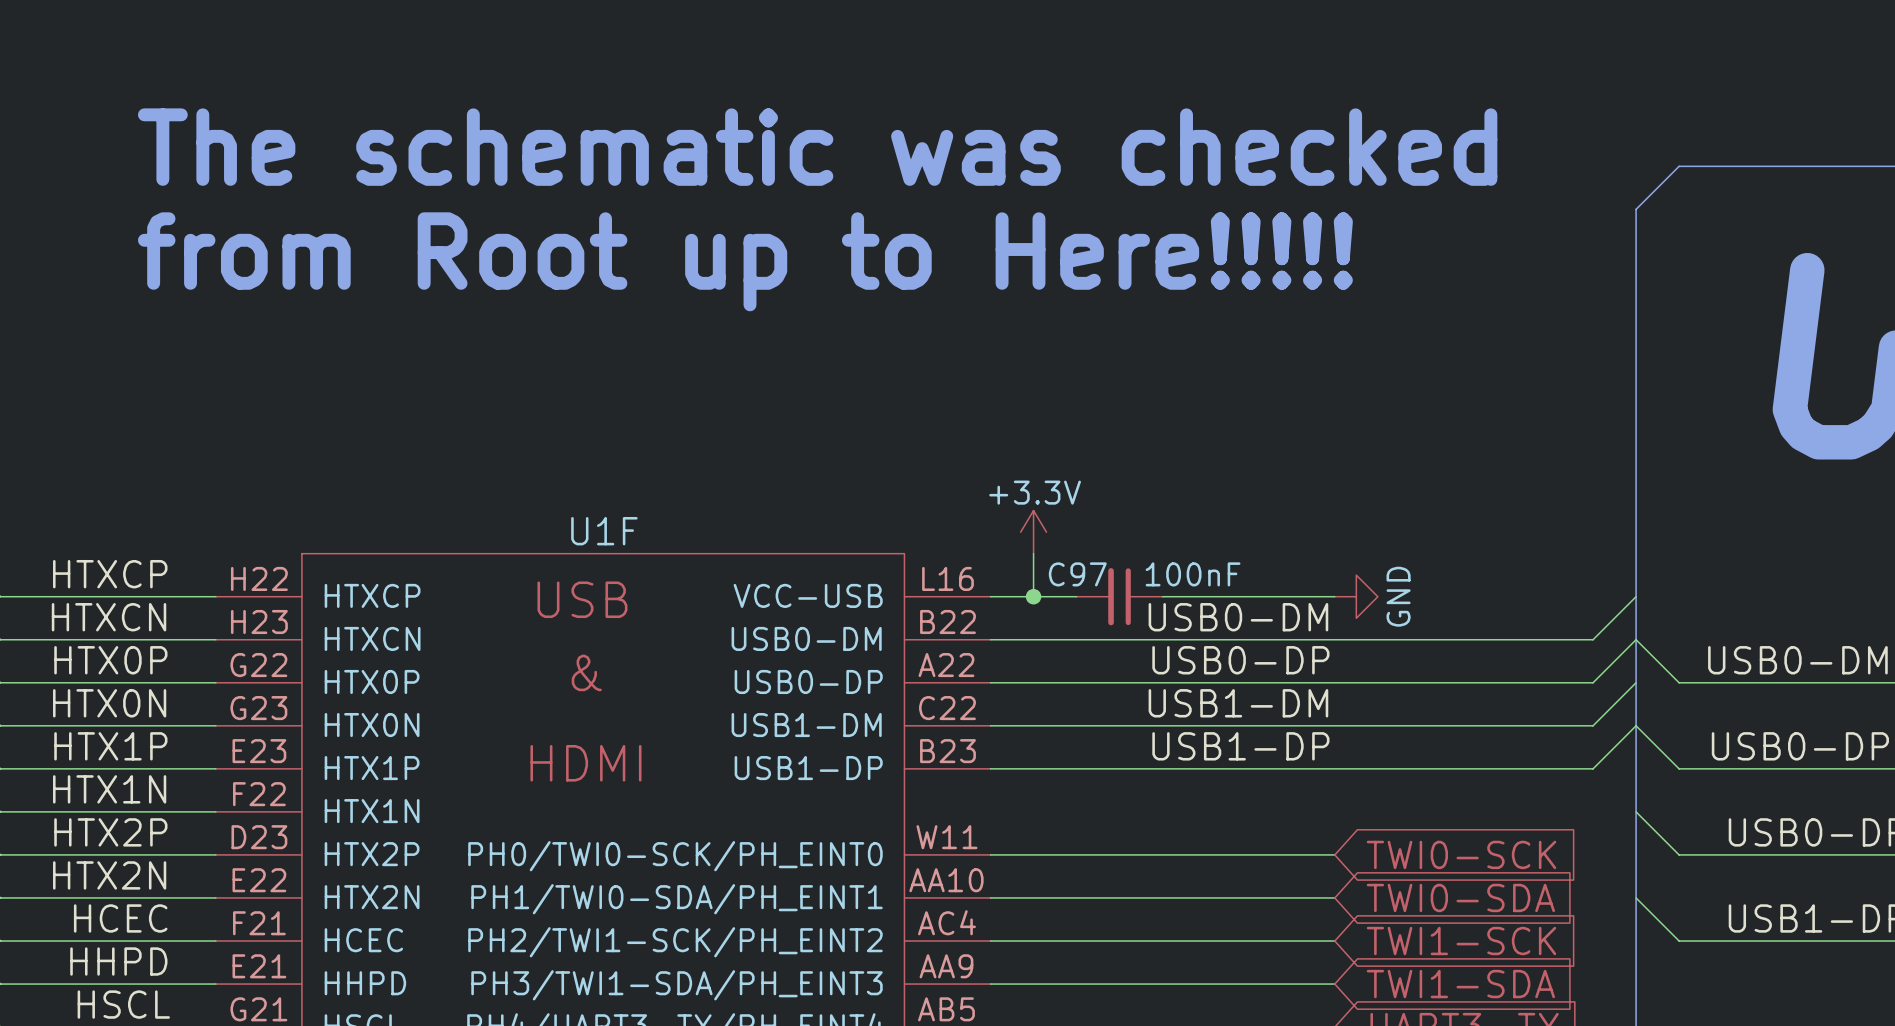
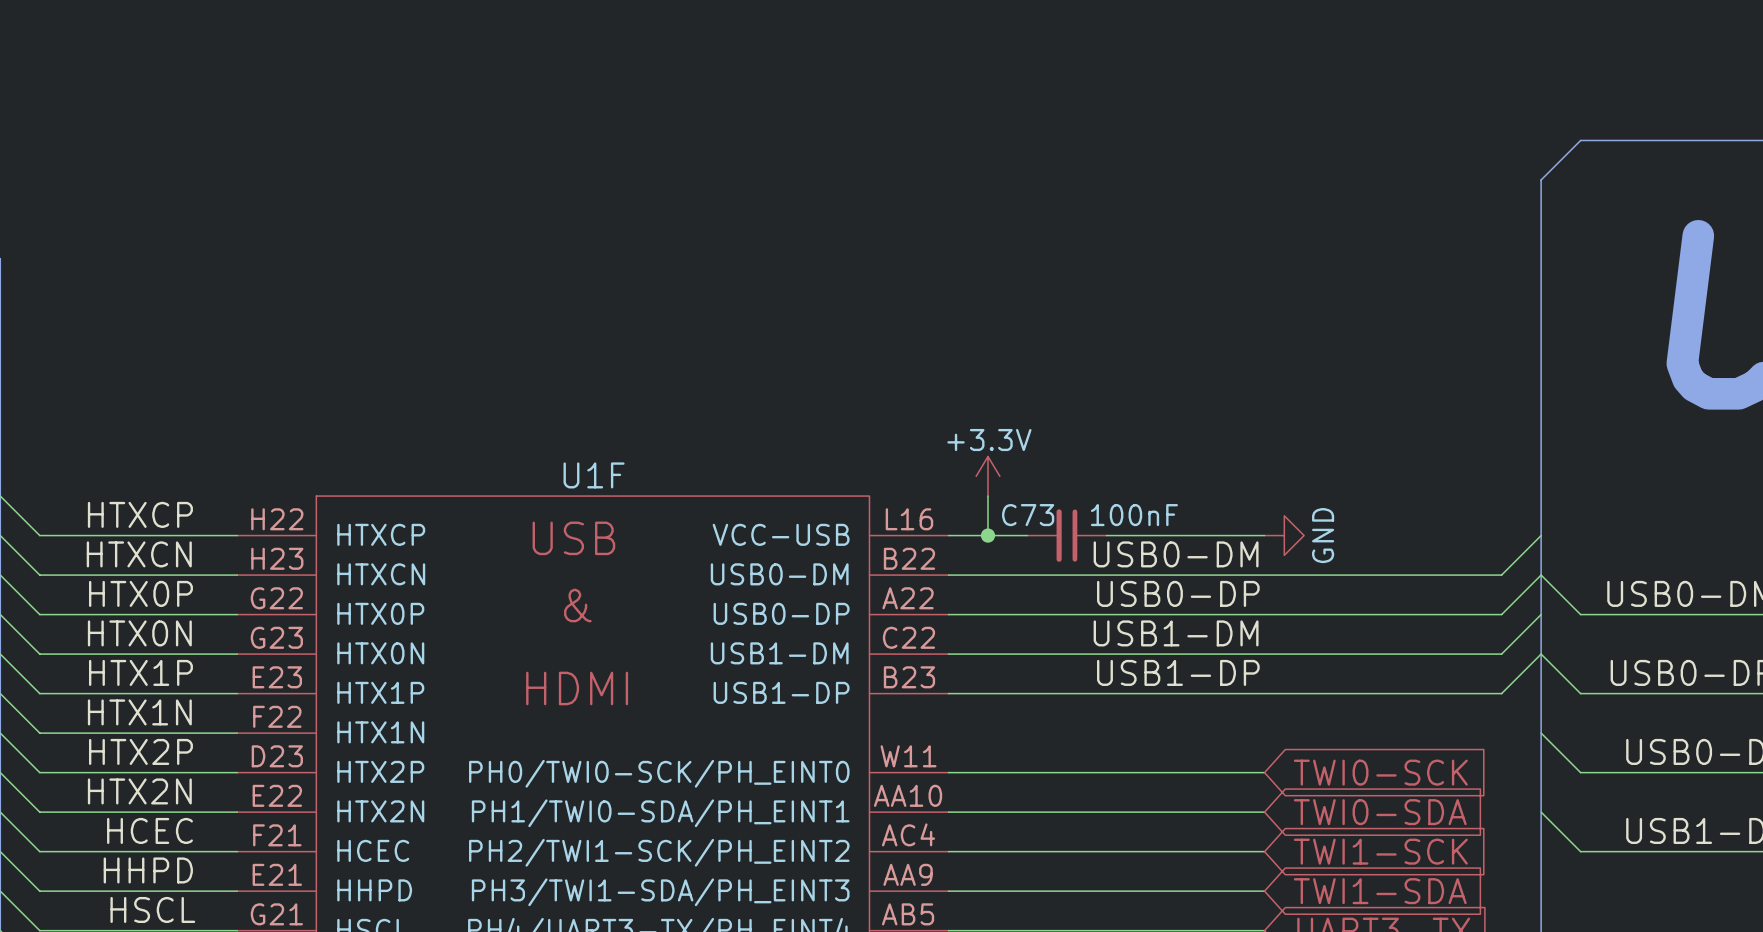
text: The schematic was checked (817, 147) -> none
text: from Root up to Here!!!!! (745, 261) -> none
C97 name: C97 (1077, 574) -> C73 (1028, 515)

